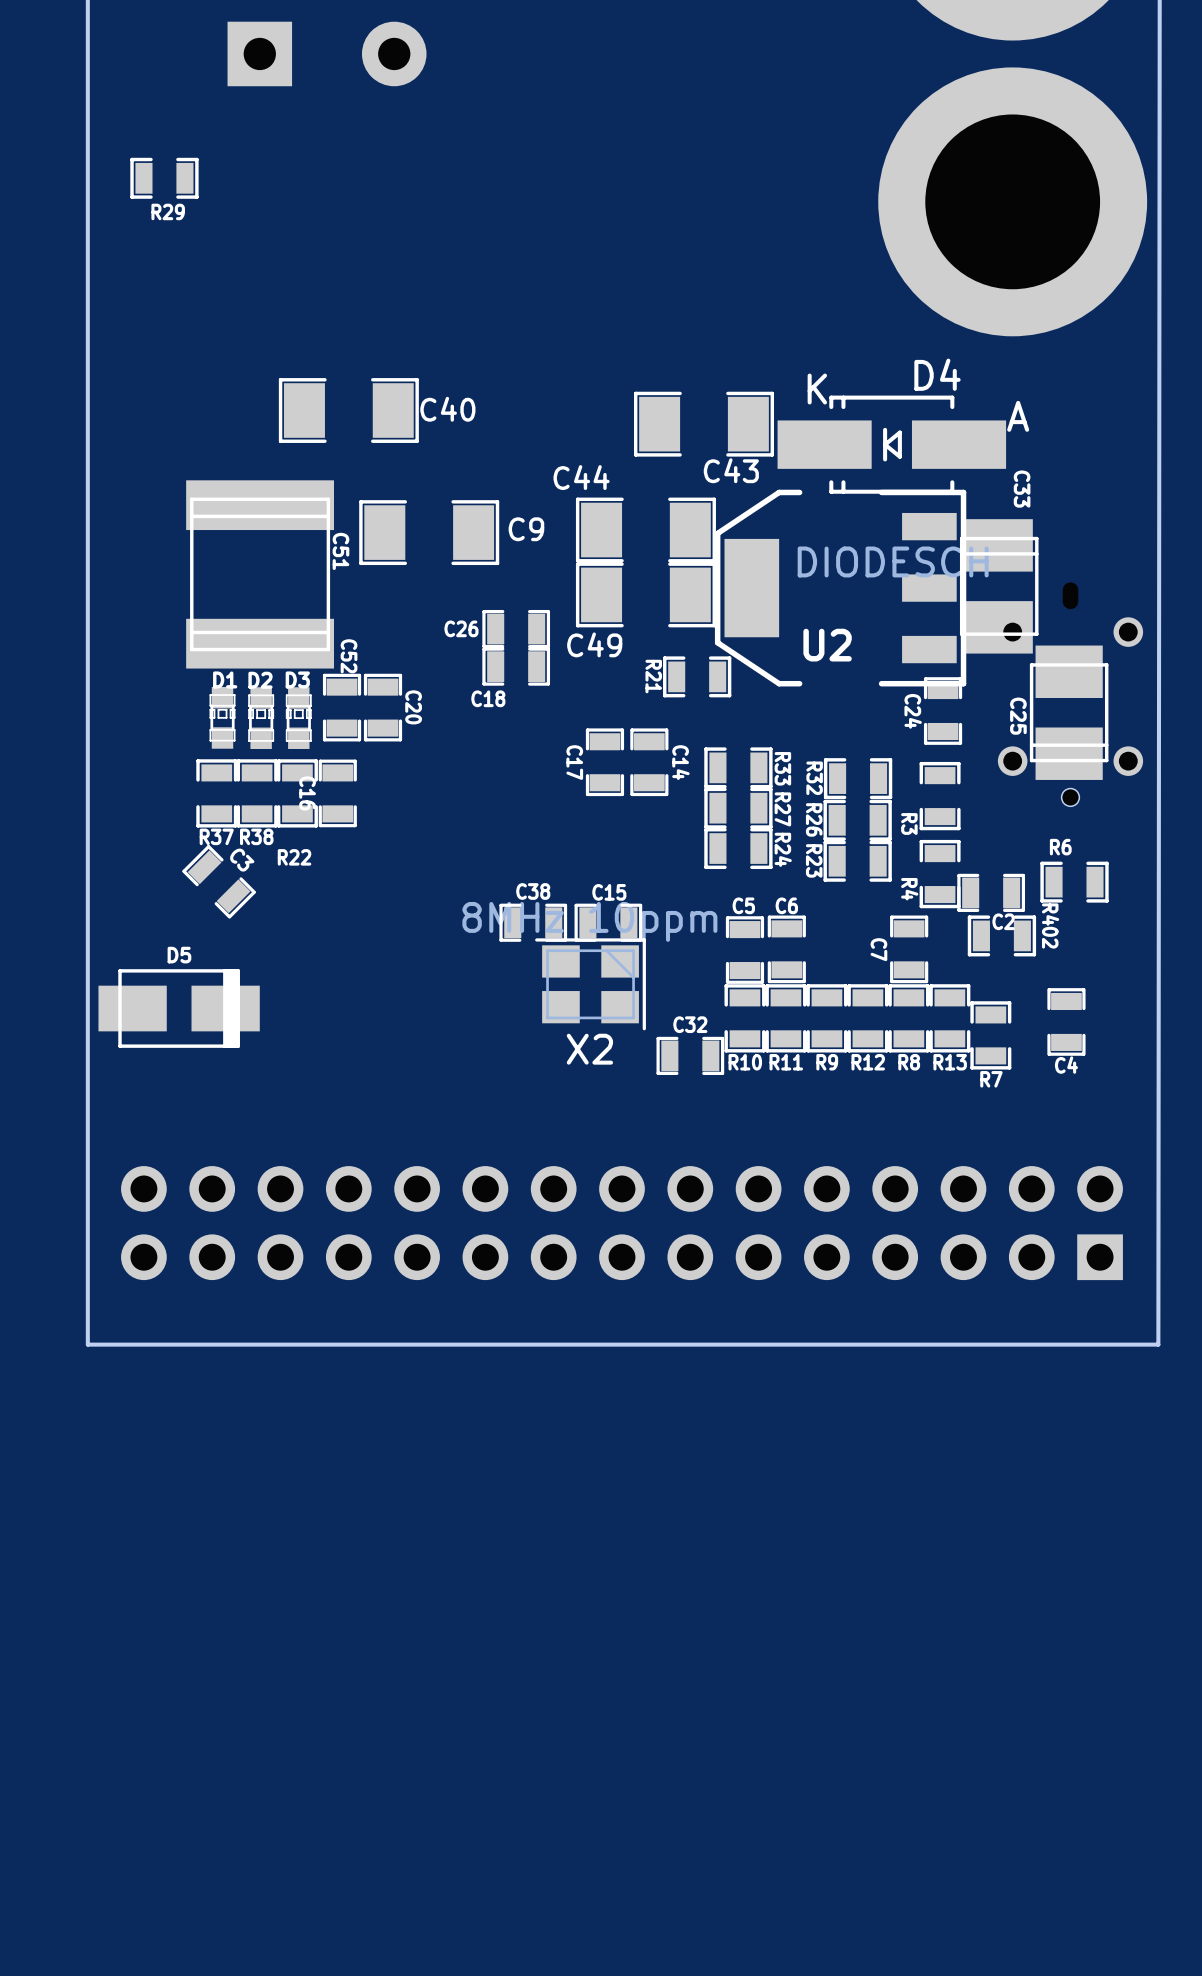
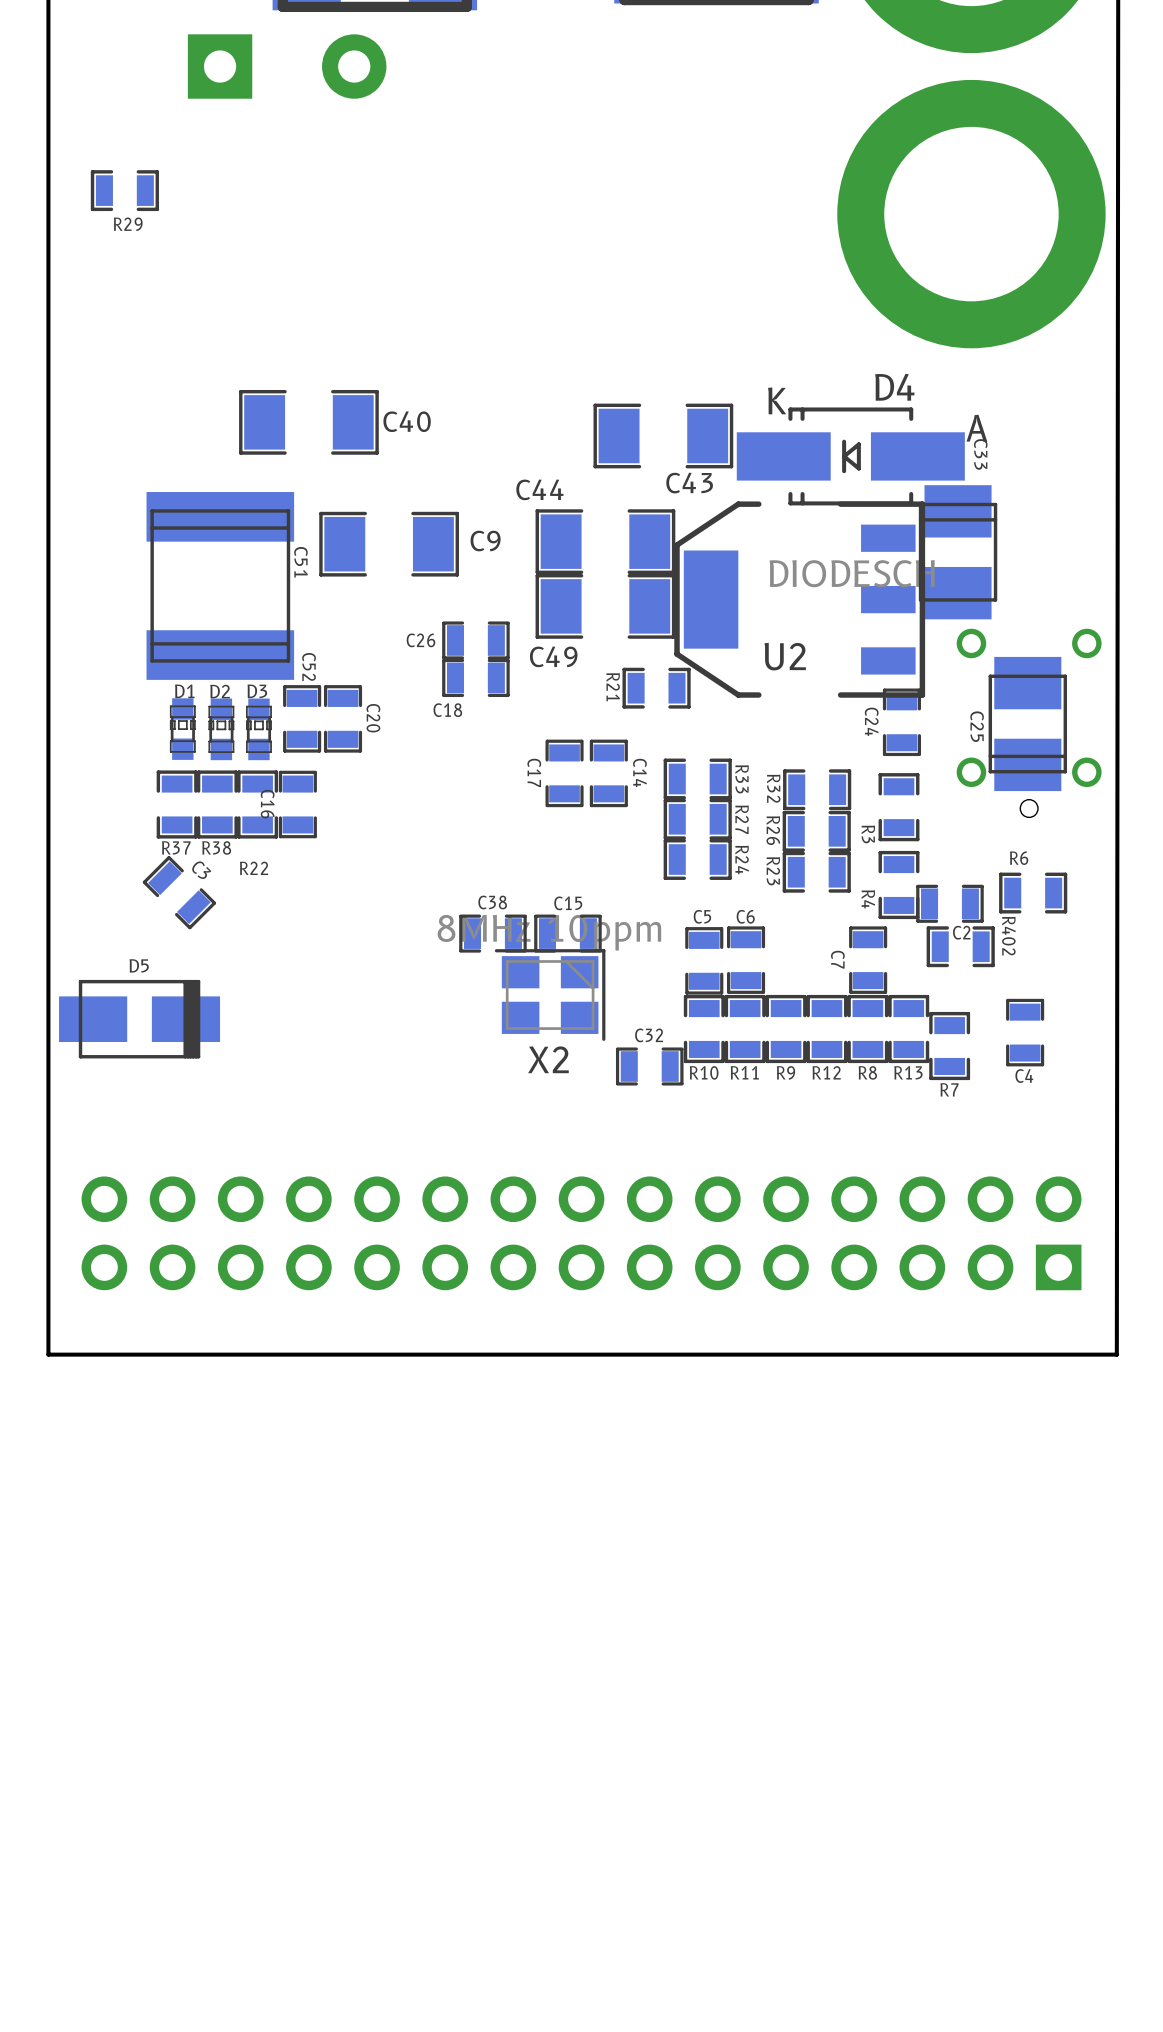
C33 position: (999, 586) -> (958, 552)

